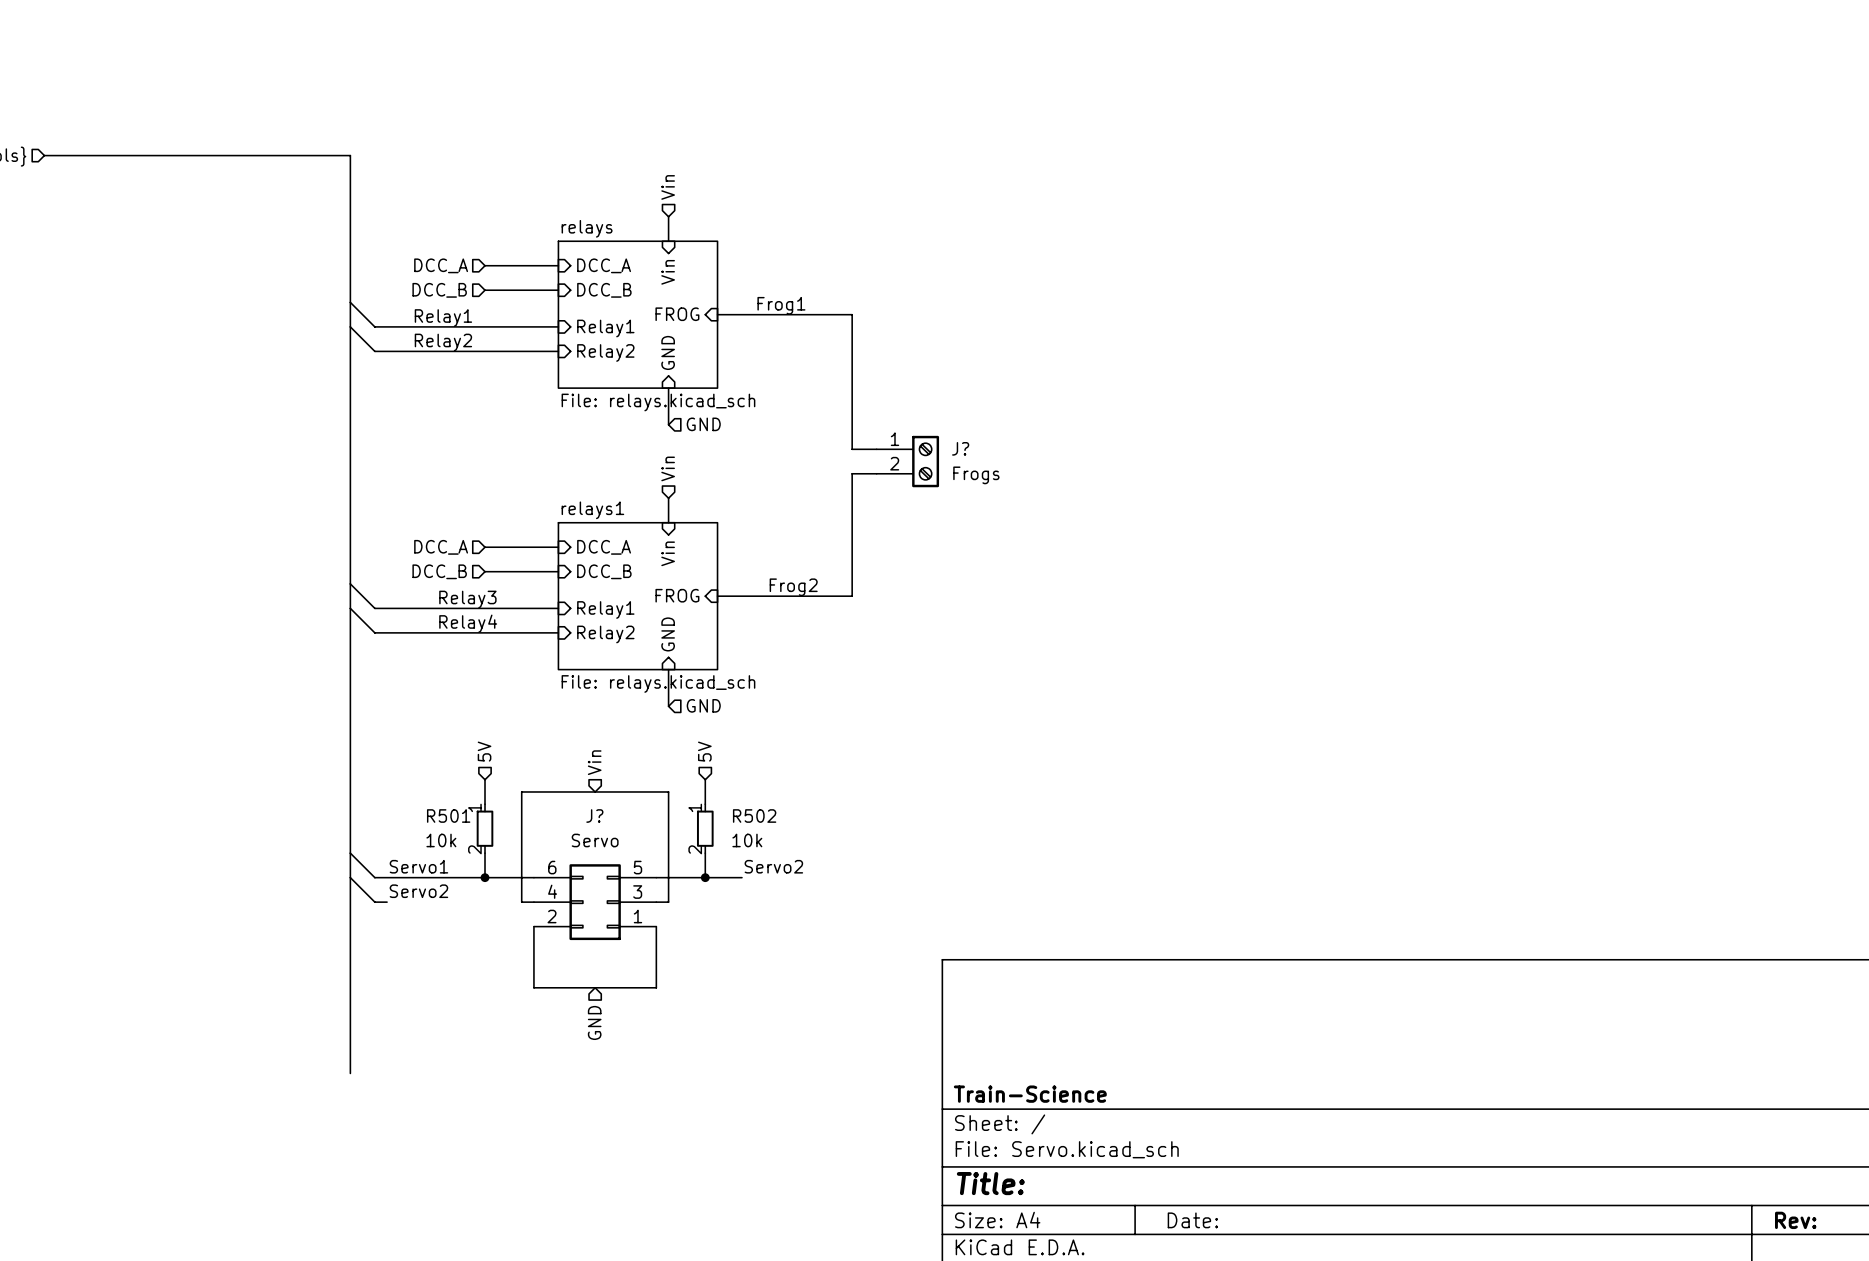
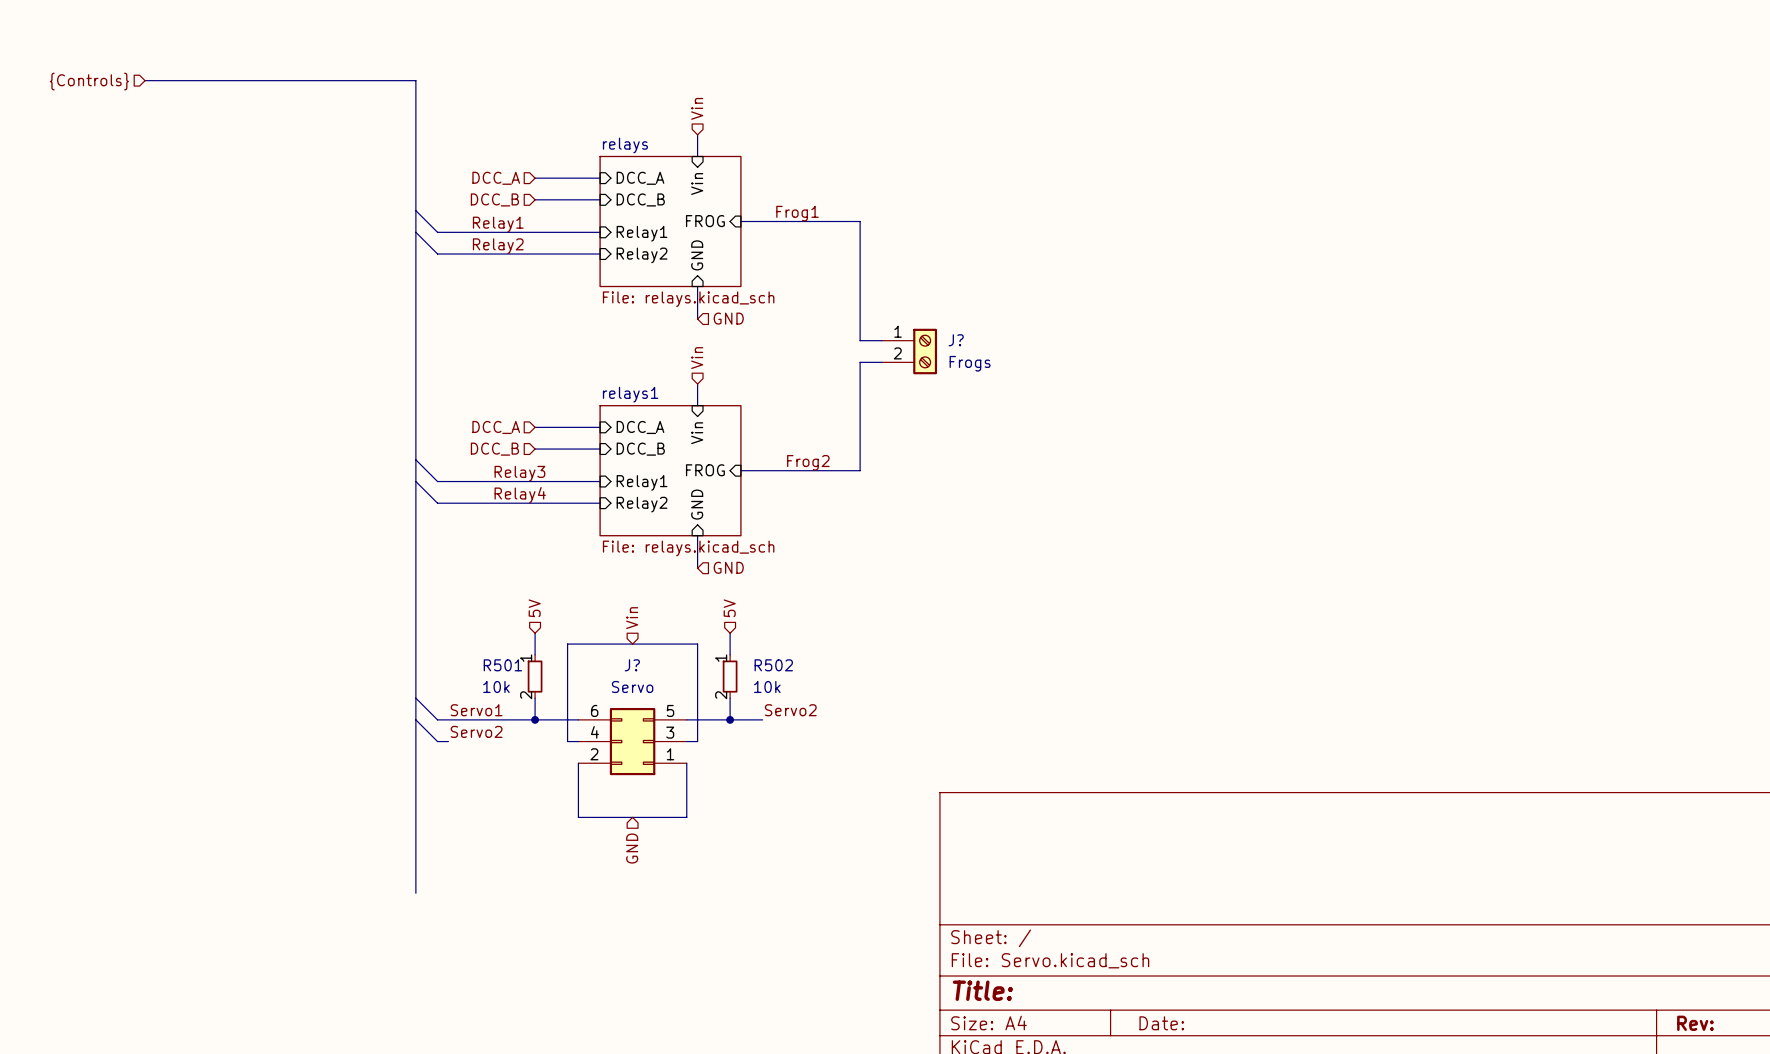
title block: Train-Science (1030, 1094) -> none

